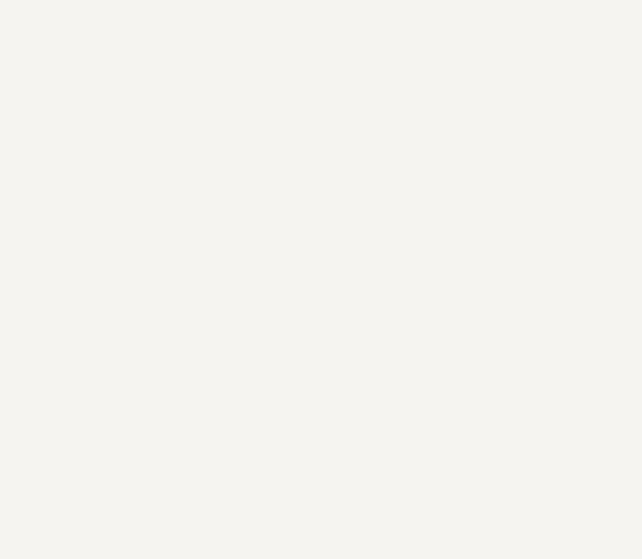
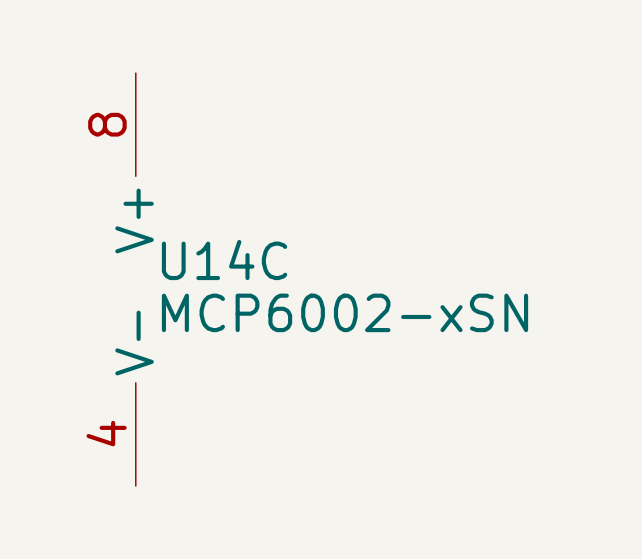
U14C: none -> MCP6002-xSN (135, 279)

